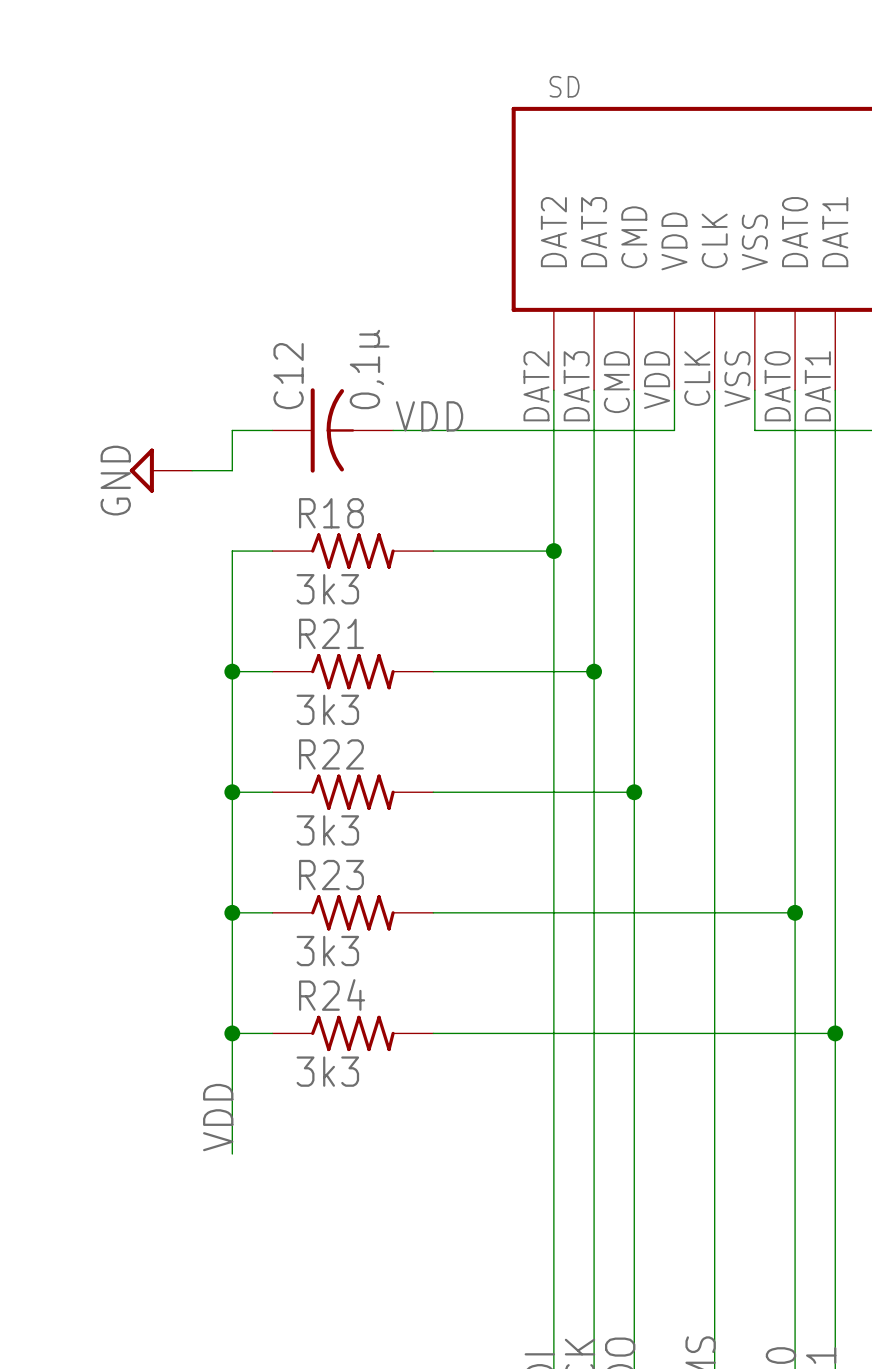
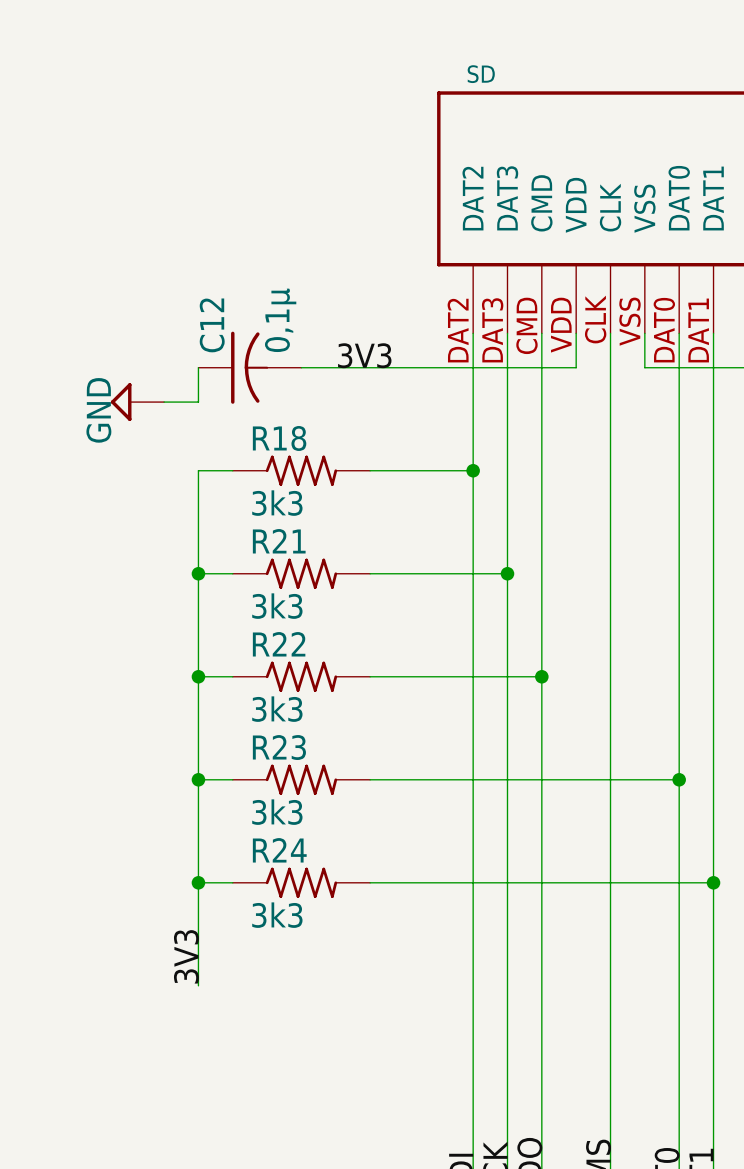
label: VDD (429, 416) -> 3V3 (364, 355)
C12 position: (332, 430) -> (249, 367)
label: VDD (218, 1117) -> 3V3 (186, 956)

